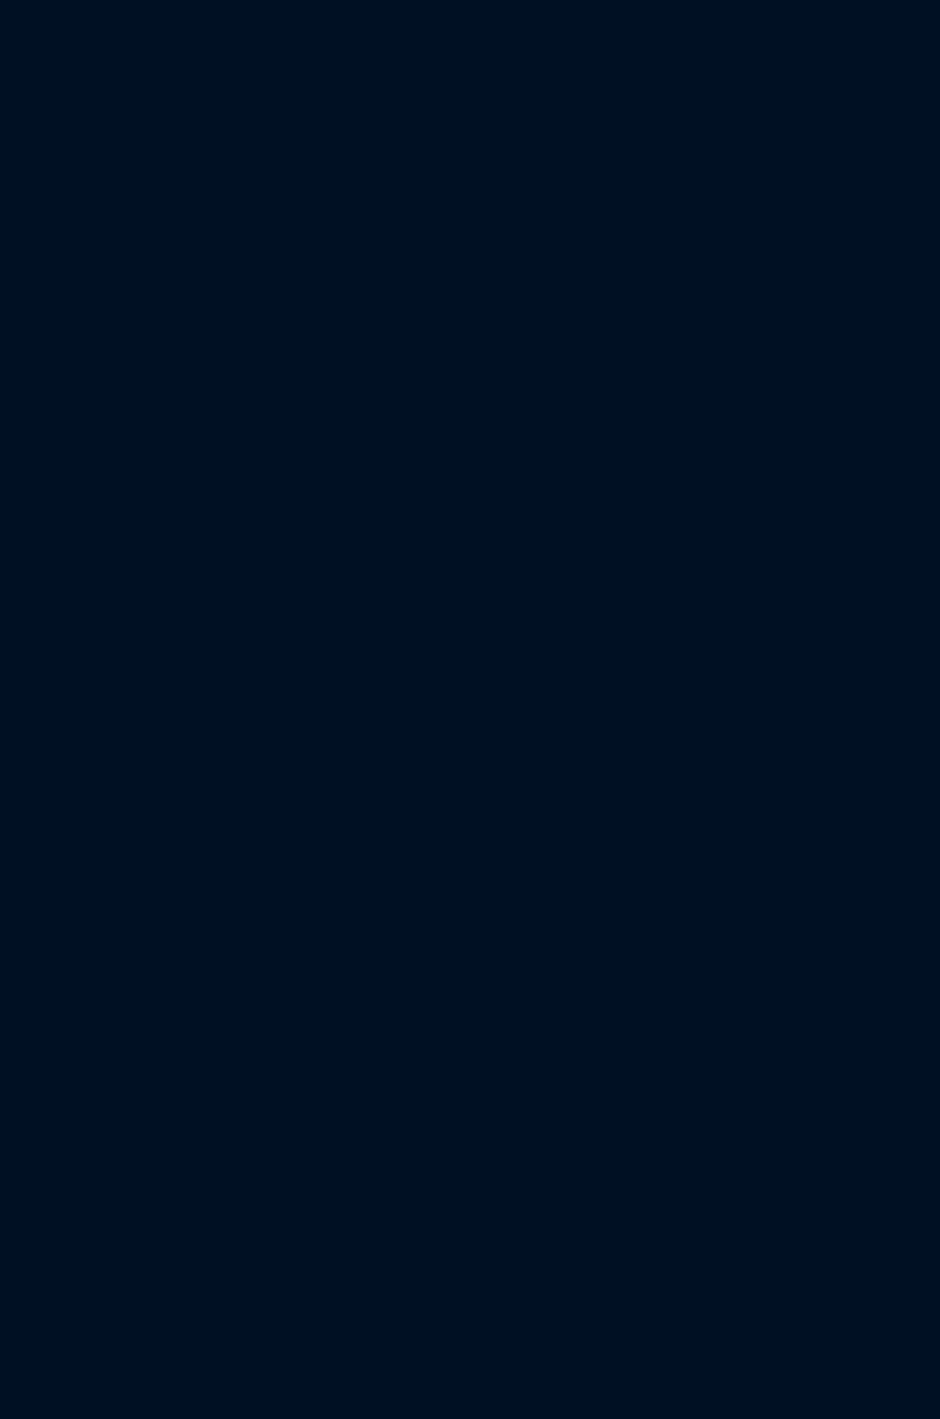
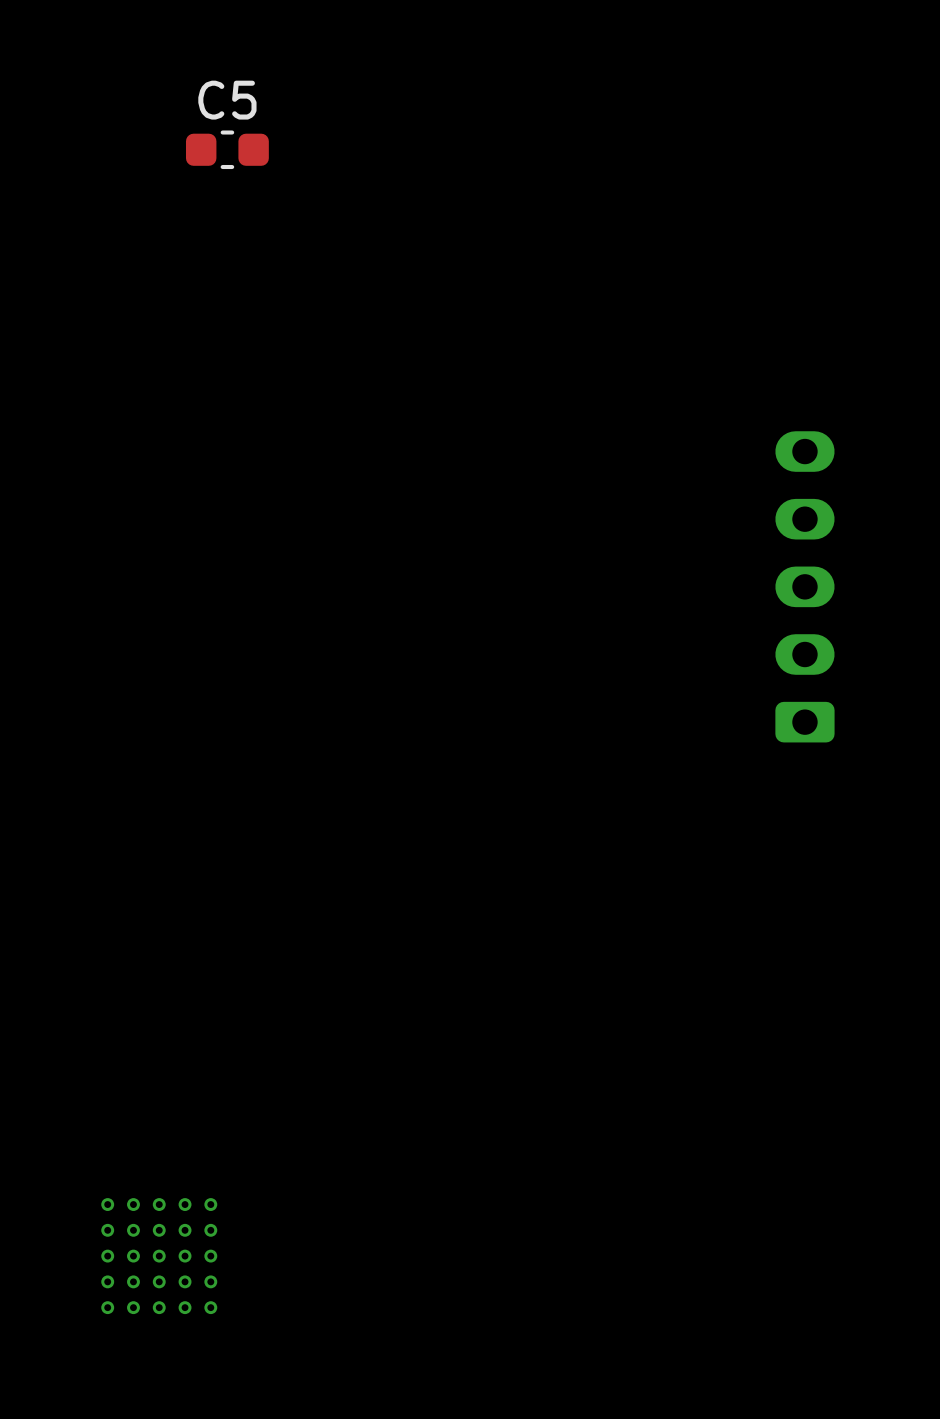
C5: none -> (227, 149)
part: none -> (804, 586)
via: none -> (107, 1204)
via: none -> (133, 1204)
via: none -> (159, 1204)
via: none -> (185, 1204)
via: none -> (210, 1204)
via: none -> (107, 1230)
via: none -> (133, 1230)
via: none -> (159, 1230)
via: none -> (185, 1230)
via: none -> (210, 1230)
via: none -> (107, 1256)
via: none -> (133, 1256)
via: none -> (159, 1256)
via: none -> (185, 1256)
via: none -> (210, 1256)
via: none -> (107, 1281)
via: none -> (133, 1281)
via: none -> (159, 1281)
via: none -> (185, 1281)
via: none -> (210, 1281)
via: none -> (107, 1307)
via: none -> (133, 1307)
via: none -> (159, 1307)
via: none -> (185, 1307)
via: none -> (210, 1307)

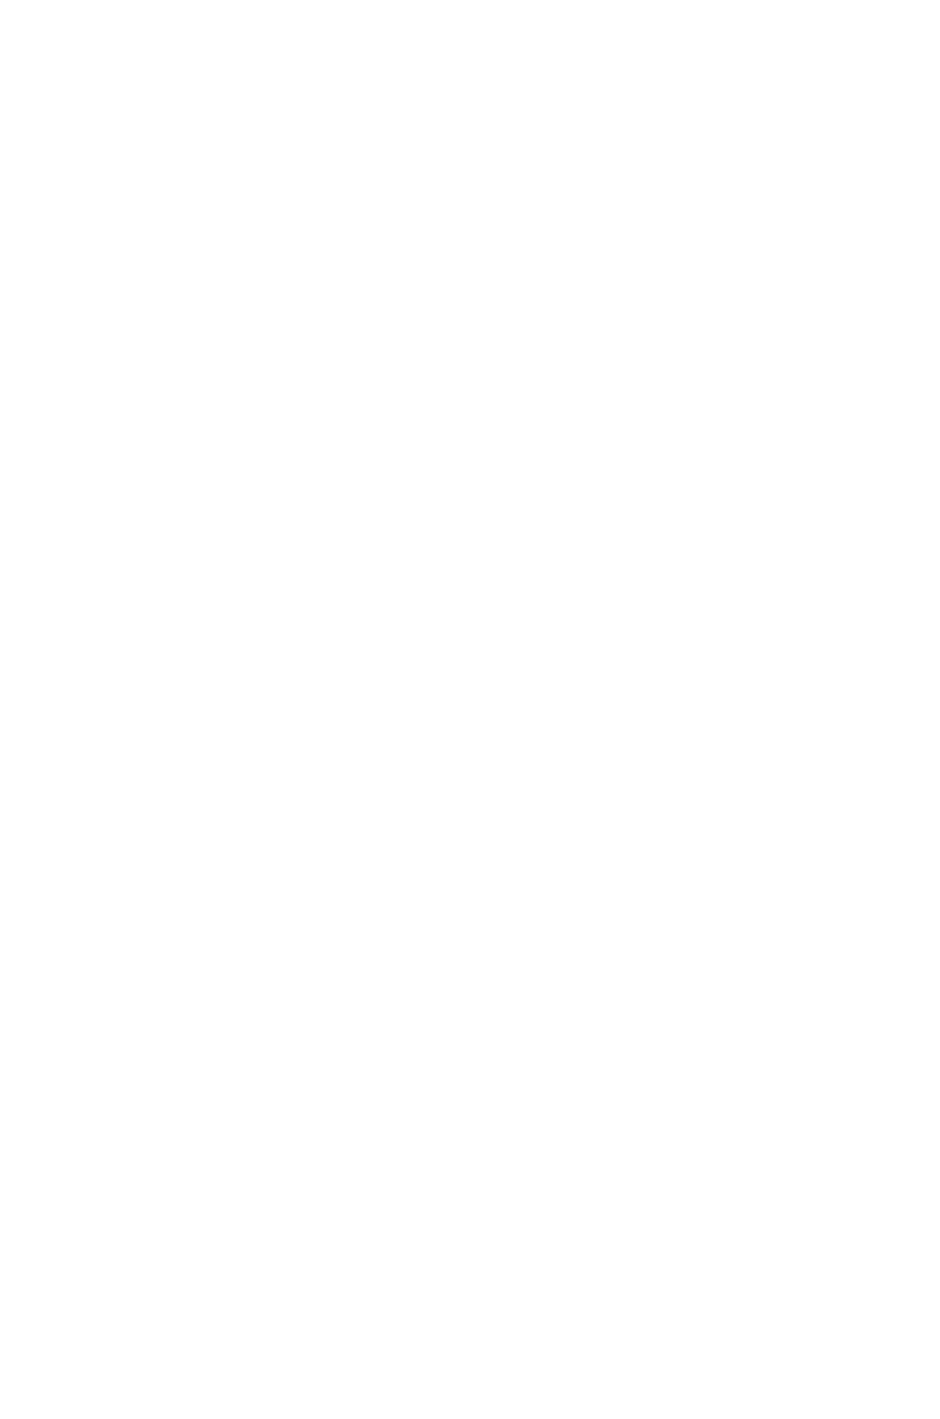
C5: (227, 149) -> none
part: (804, 586) -> none
via: (107, 1204) -> none
via: (133, 1204) -> none
via: (159, 1204) -> none
via: (185, 1204) -> none
via: (210, 1204) -> none
via: (107, 1230) -> none
via: (133, 1230) -> none
via: (159, 1230) -> none
via: (185, 1230) -> none
via: (210, 1230) -> none
via: (107, 1256) -> none
via: (133, 1256) -> none
via: (159, 1256) -> none
via: (185, 1256) -> none
via: (210, 1256) -> none
via: (107, 1281) -> none
via: (133, 1281) -> none
via: (159, 1281) -> none
via: (185, 1281) -> none
via: (210, 1281) -> none
via: (107, 1307) -> none
via: (133, 1307) -> none
via: (159, 1307) -> none
via: (185, 1307) -> none
via: (210, 1307) -> none

